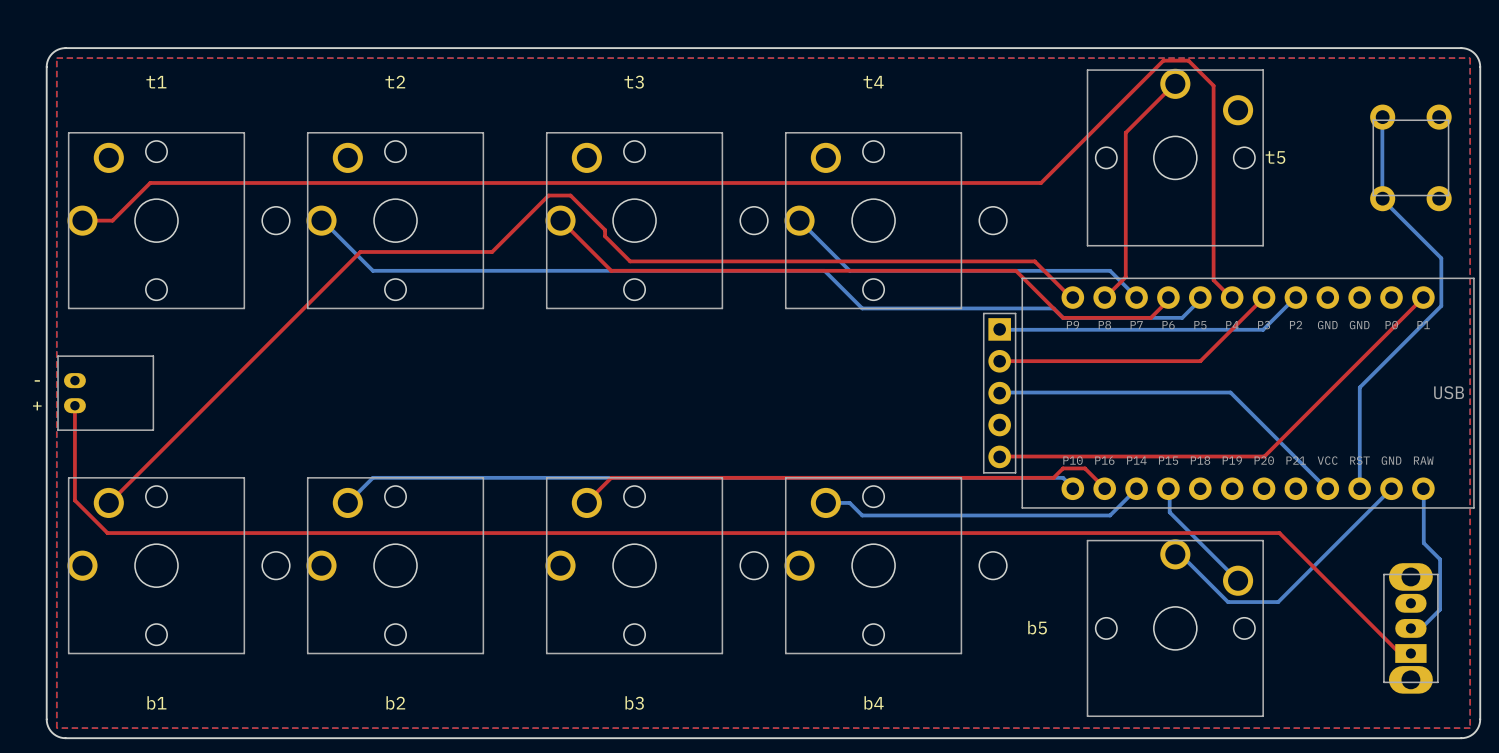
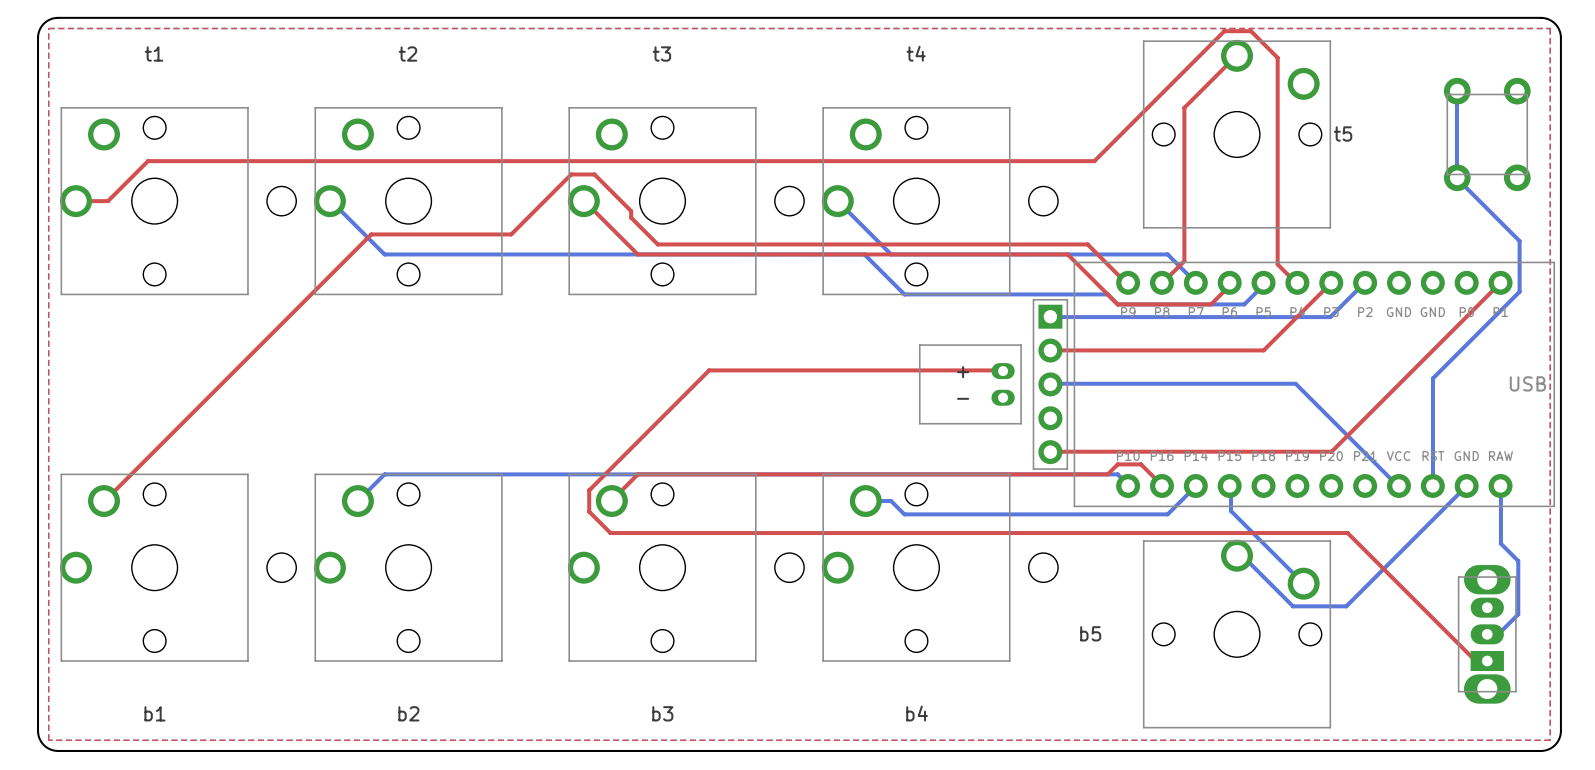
part: (105, 393) -> none
part: none -> (970, 384)
top track: (74, 405) (74, 500) (107, 533) (585, 533) -> (1003, 371) (709, 370) (589, 490) (589, 511) (610, 533)

